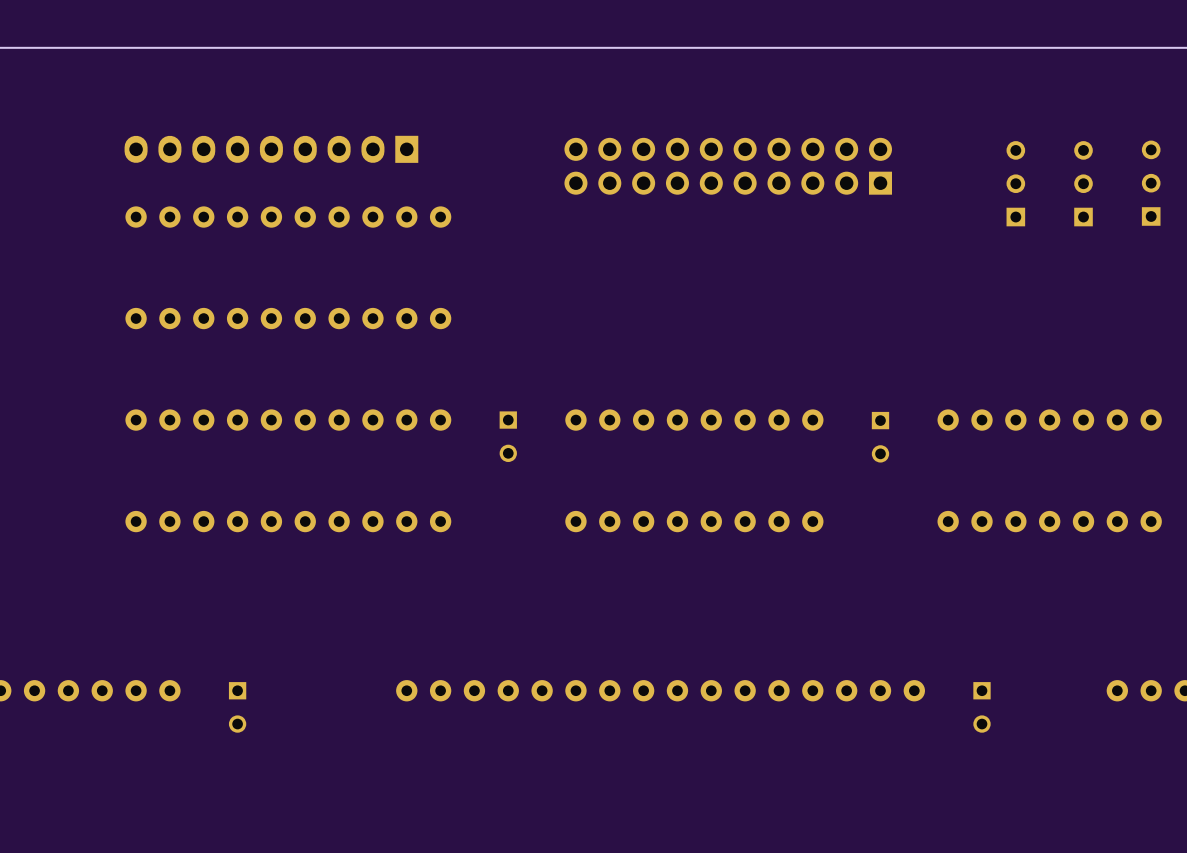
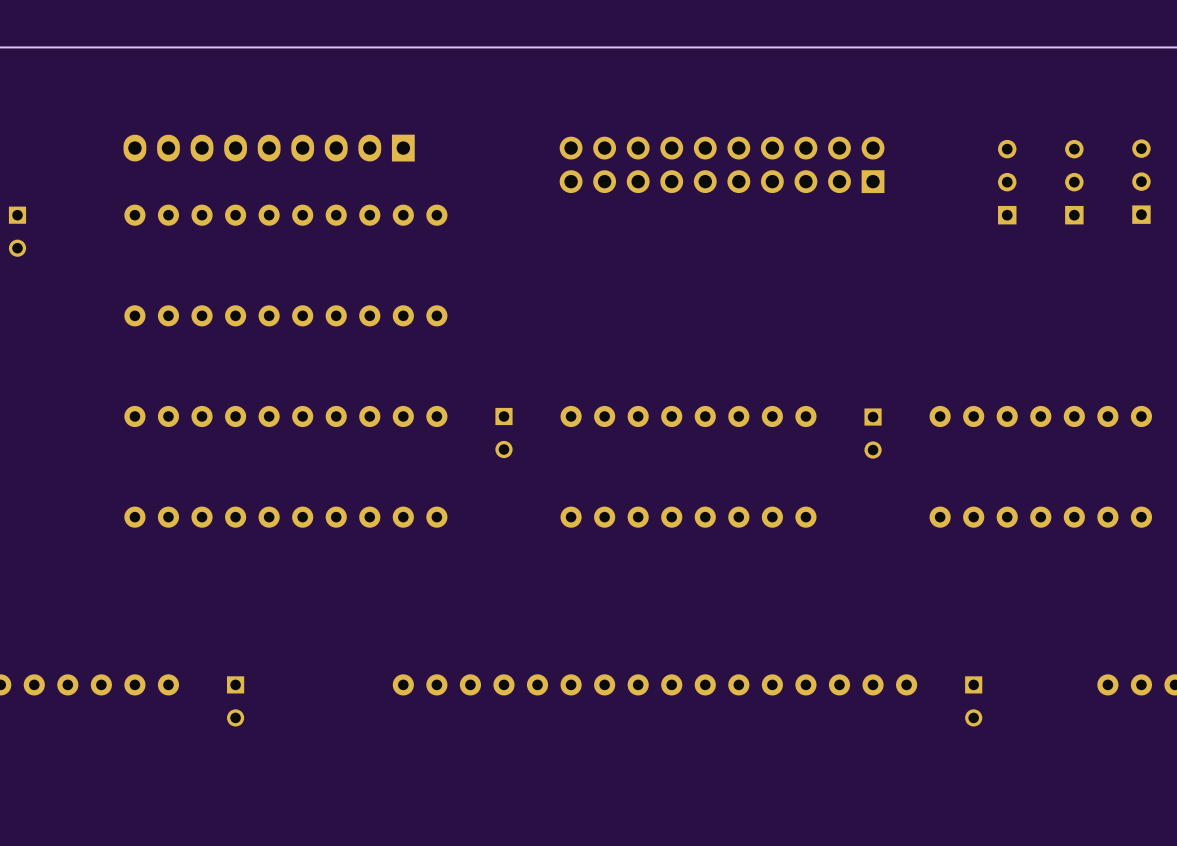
part: none -> (17, 231)

